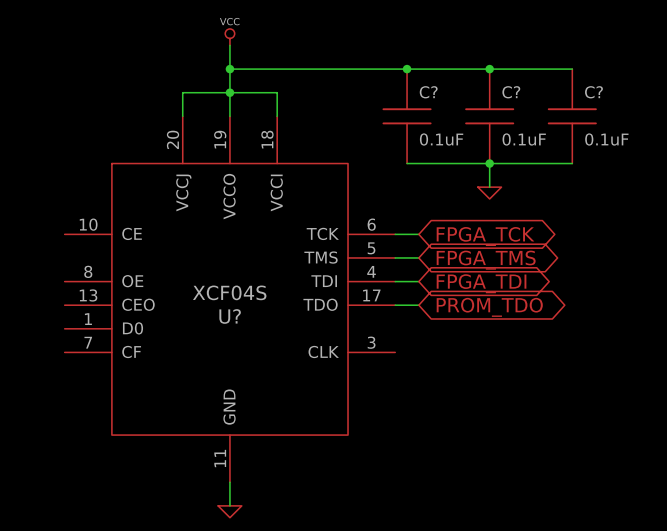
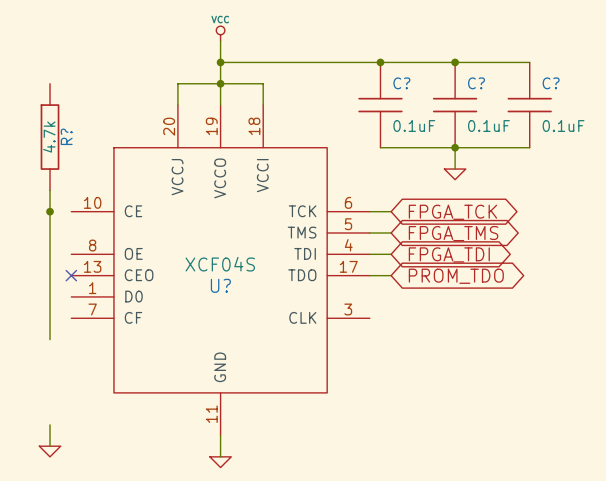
R?: none -> 4.7k (50, 137)
wire: none -> (50, 190) (50, 339)
junction: none -> (50, 211)
no-connect mark: none -> (71, 275)
wire: none -> (50, 424) (50, 446)
power symbol: none -> (50, 451)

